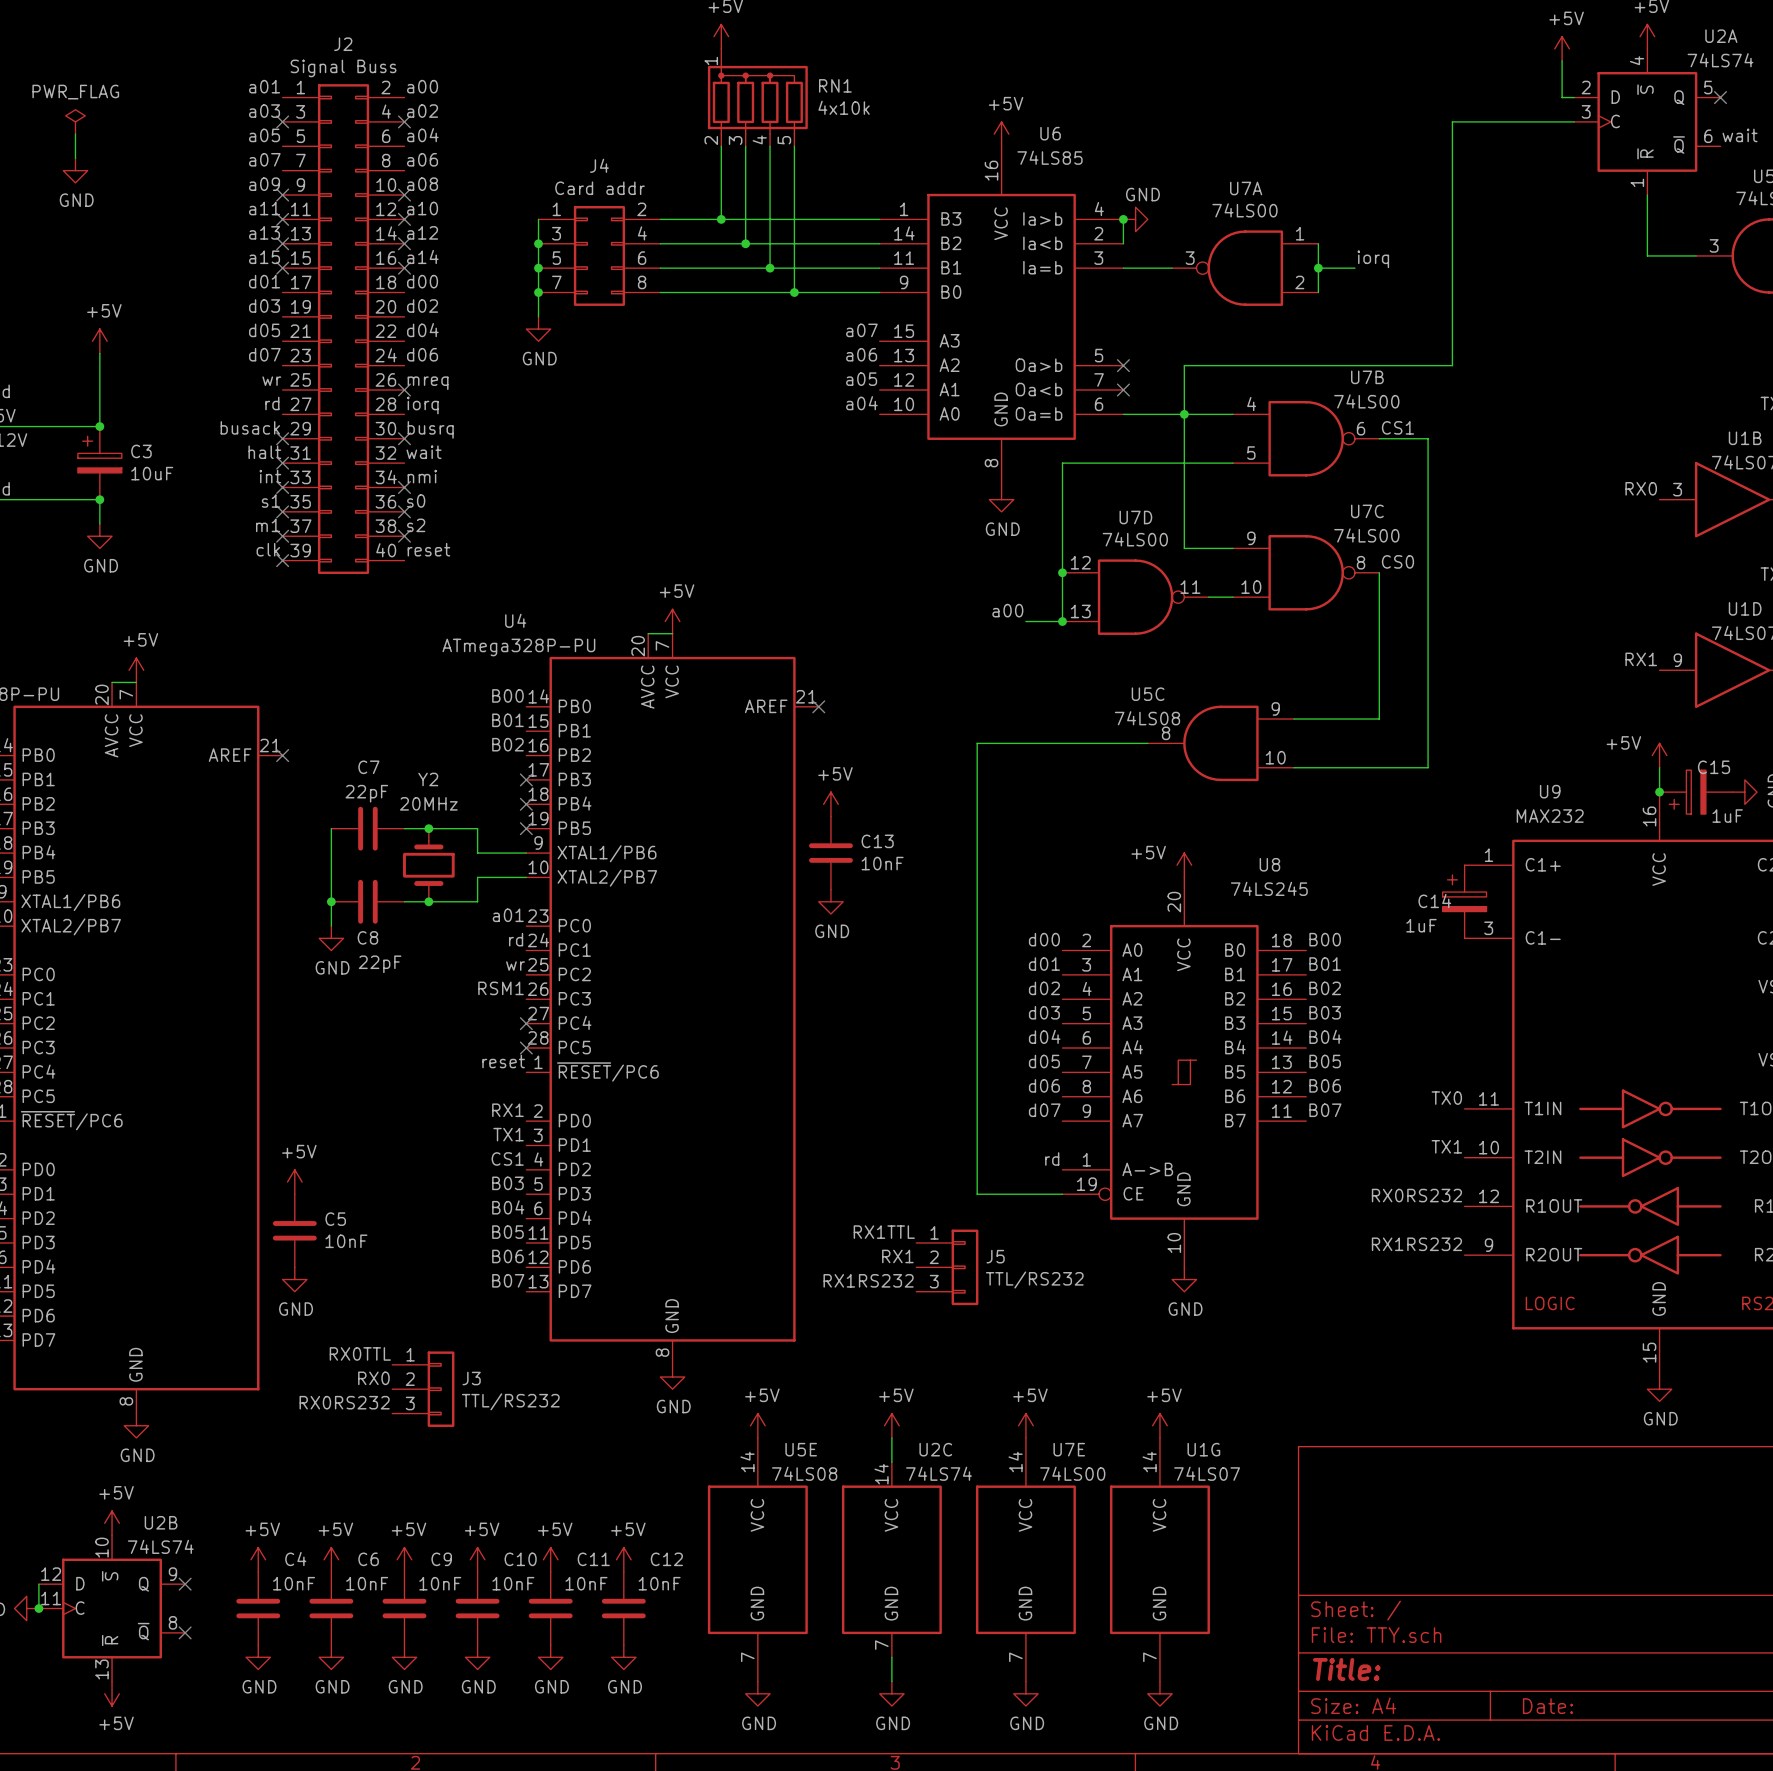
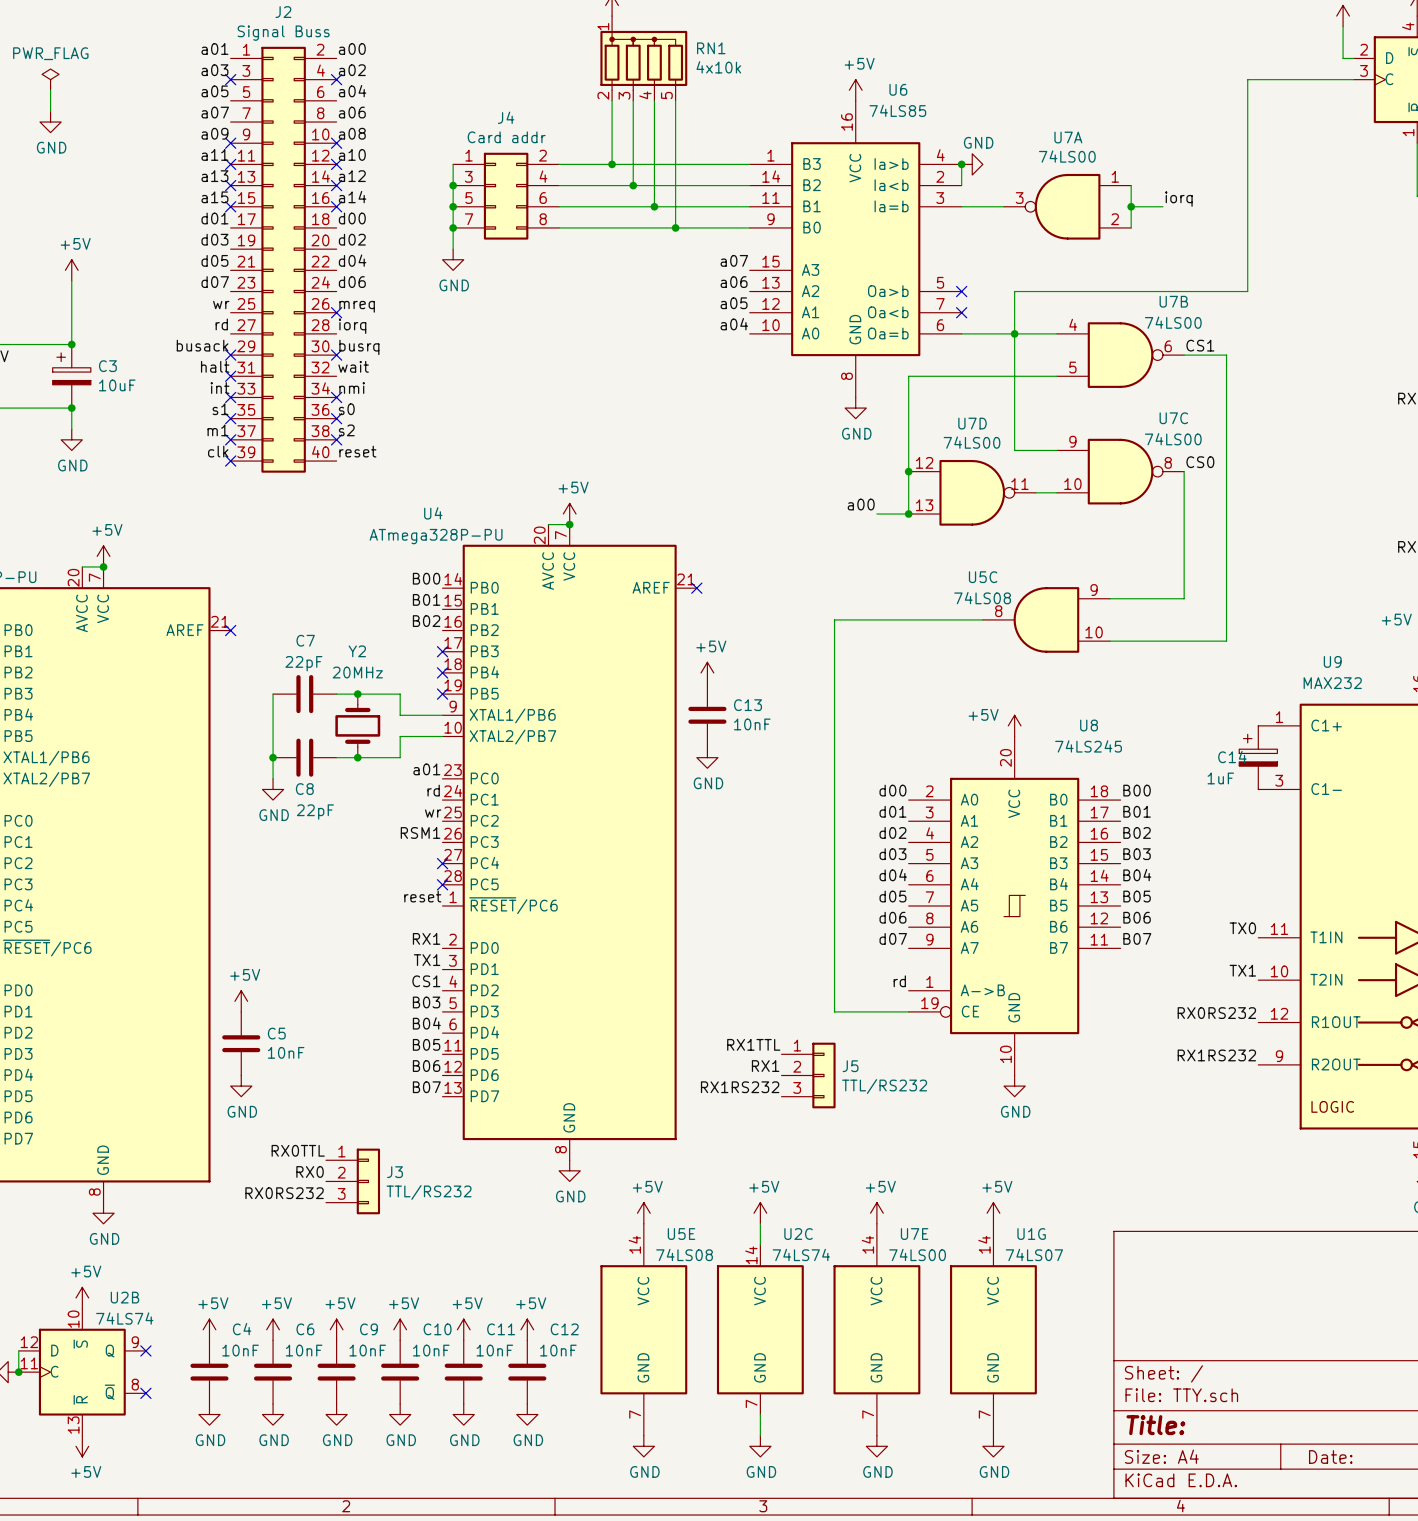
junction: none -> (569, 524)
junction: none -> (103, 566)

